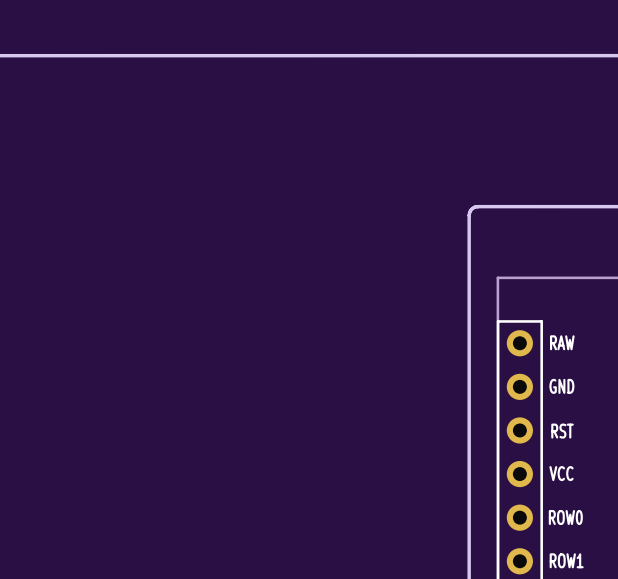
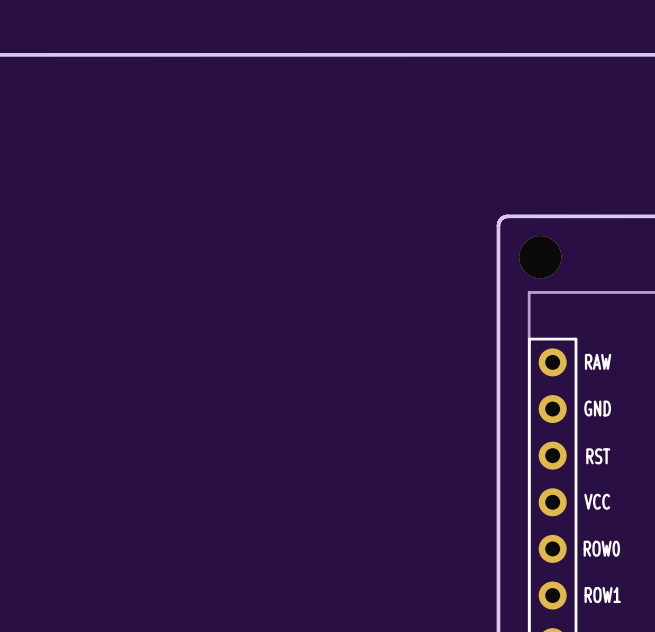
part: none -> (540, 257)

